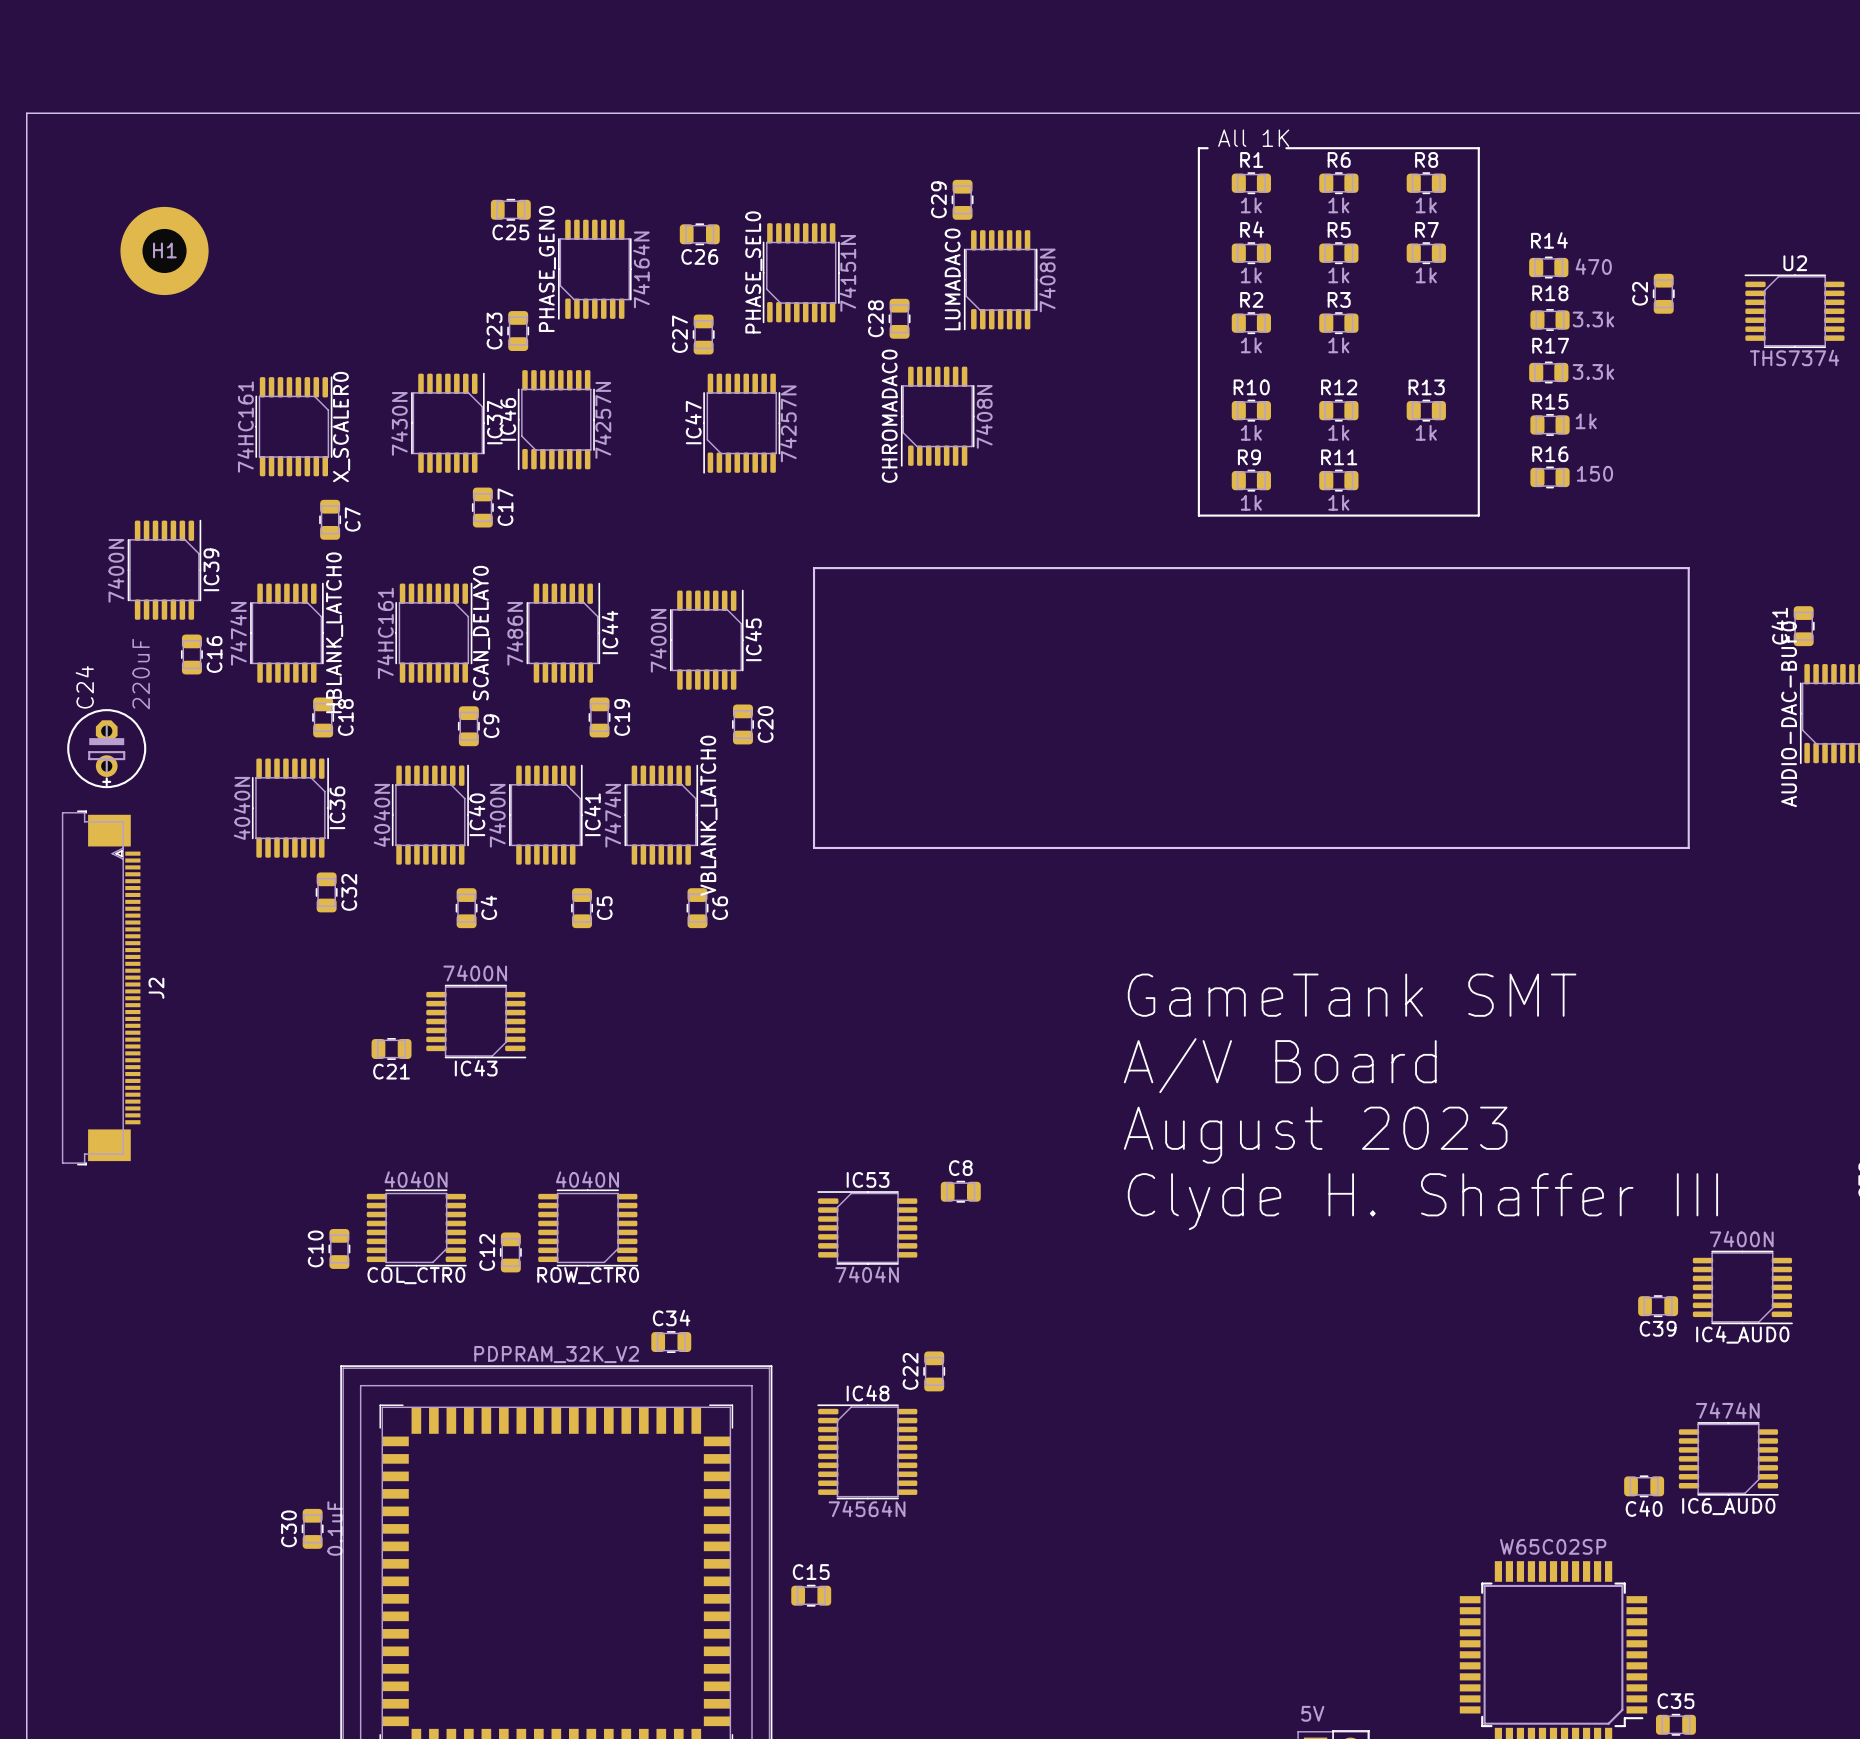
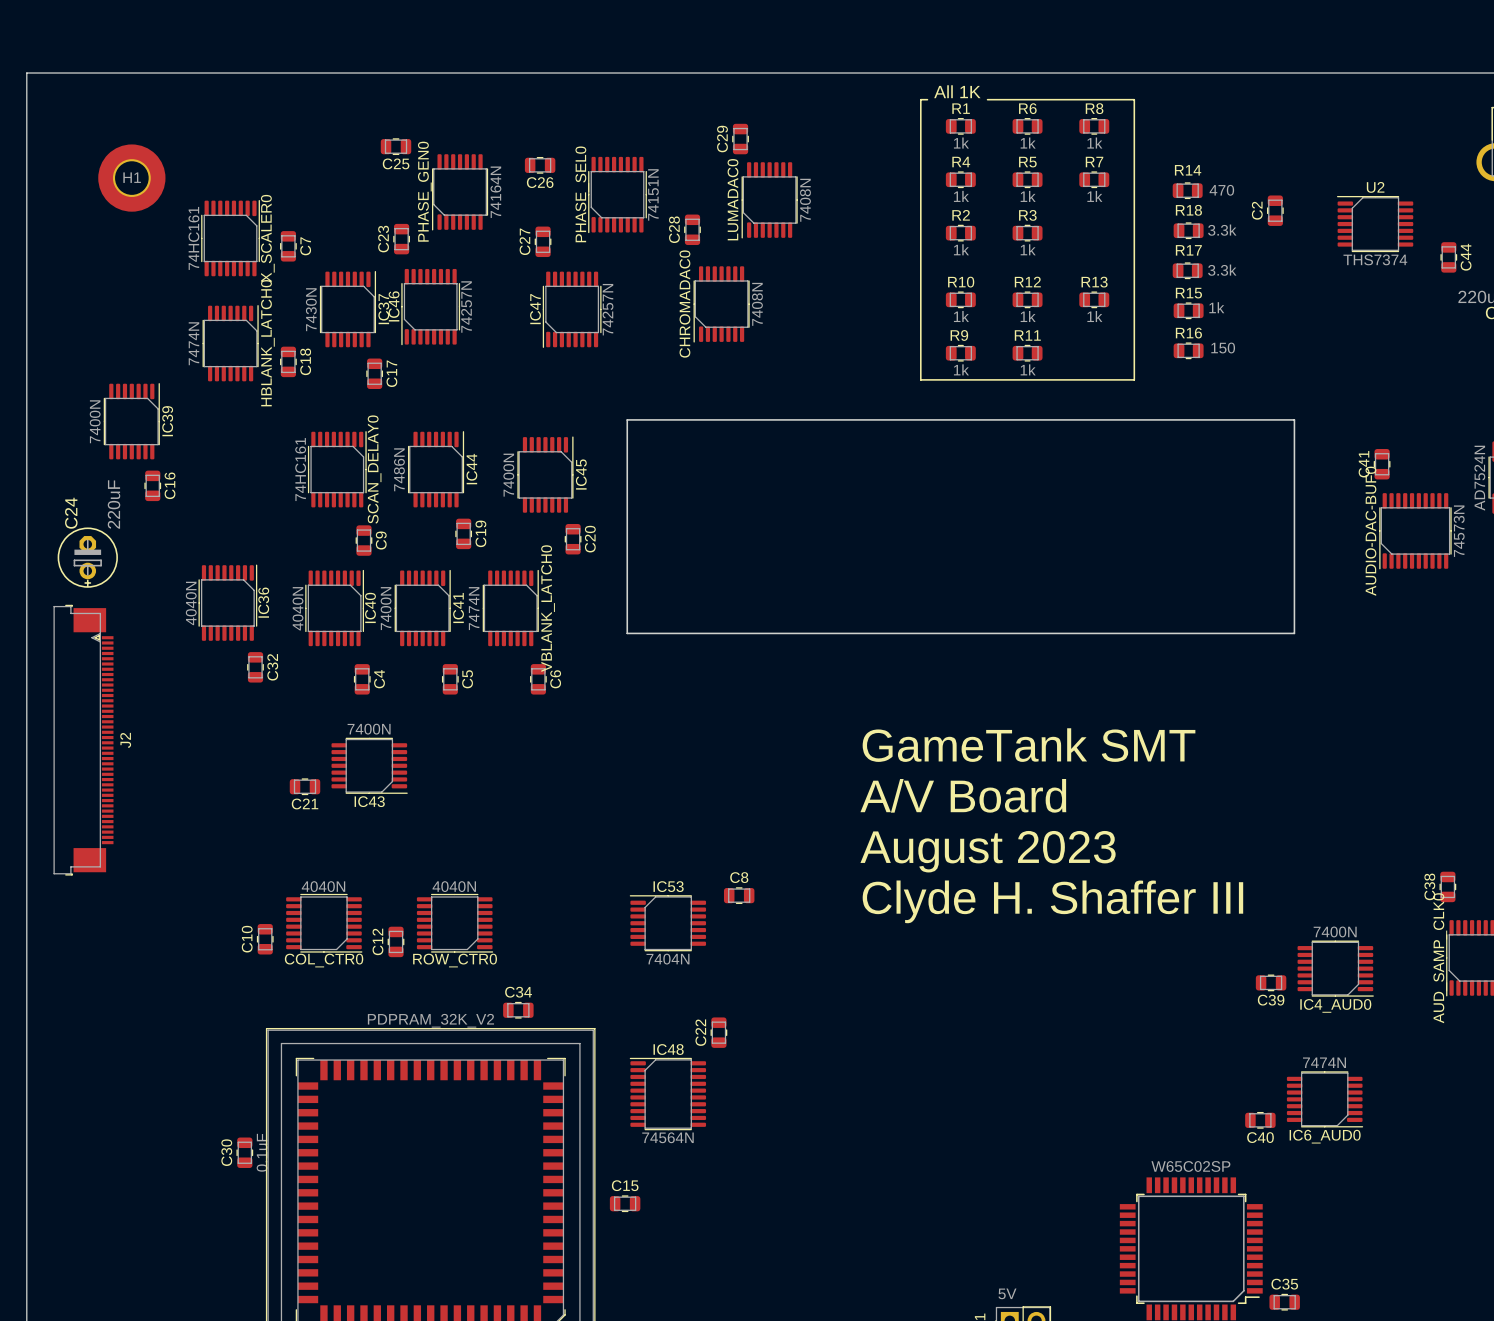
X_SCALER0 position: (293, 426) -> (230, 238)
C7 position: (330, 519) -> (288, 246)
HBLANK_LATCH0 position: (286, 632) -> (230, 343)
C18 position: (323, 717) -> (288, 361)

